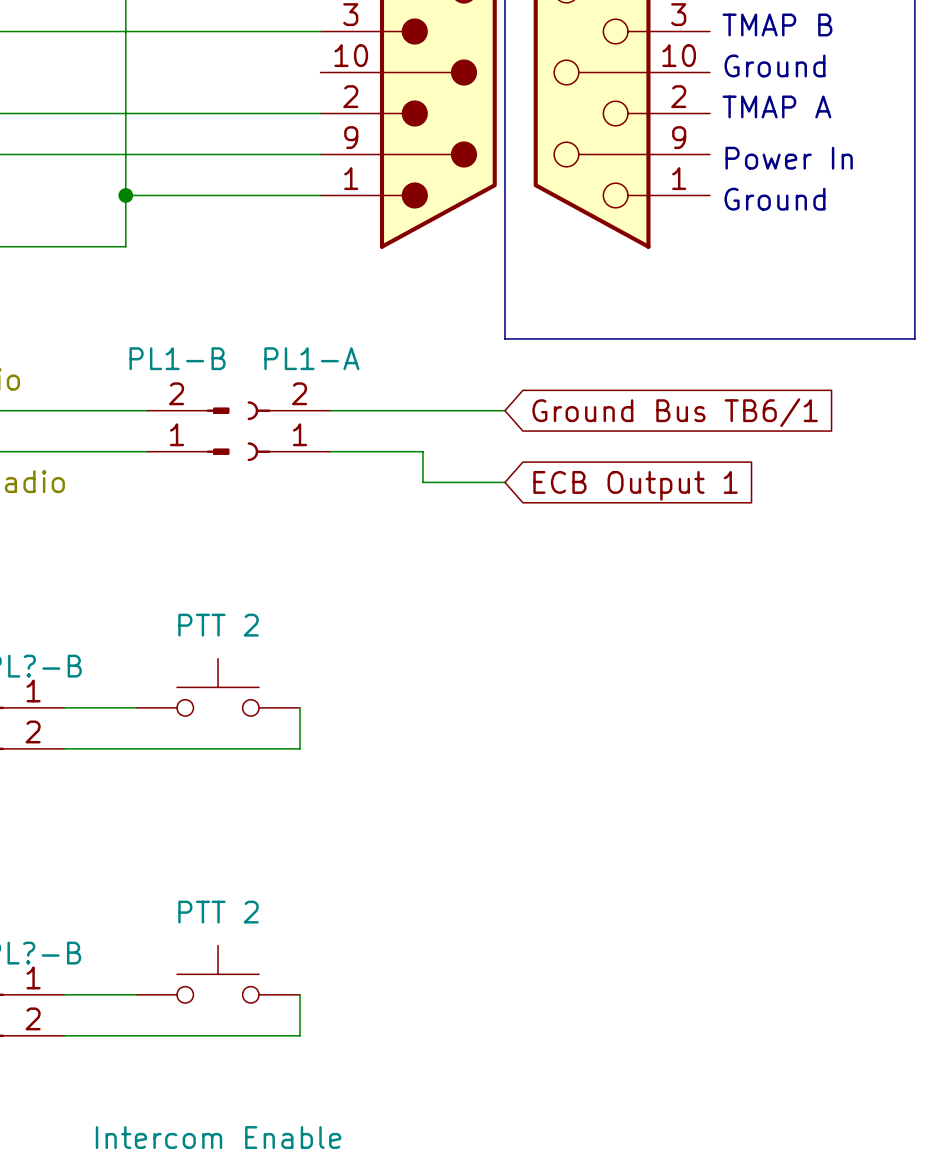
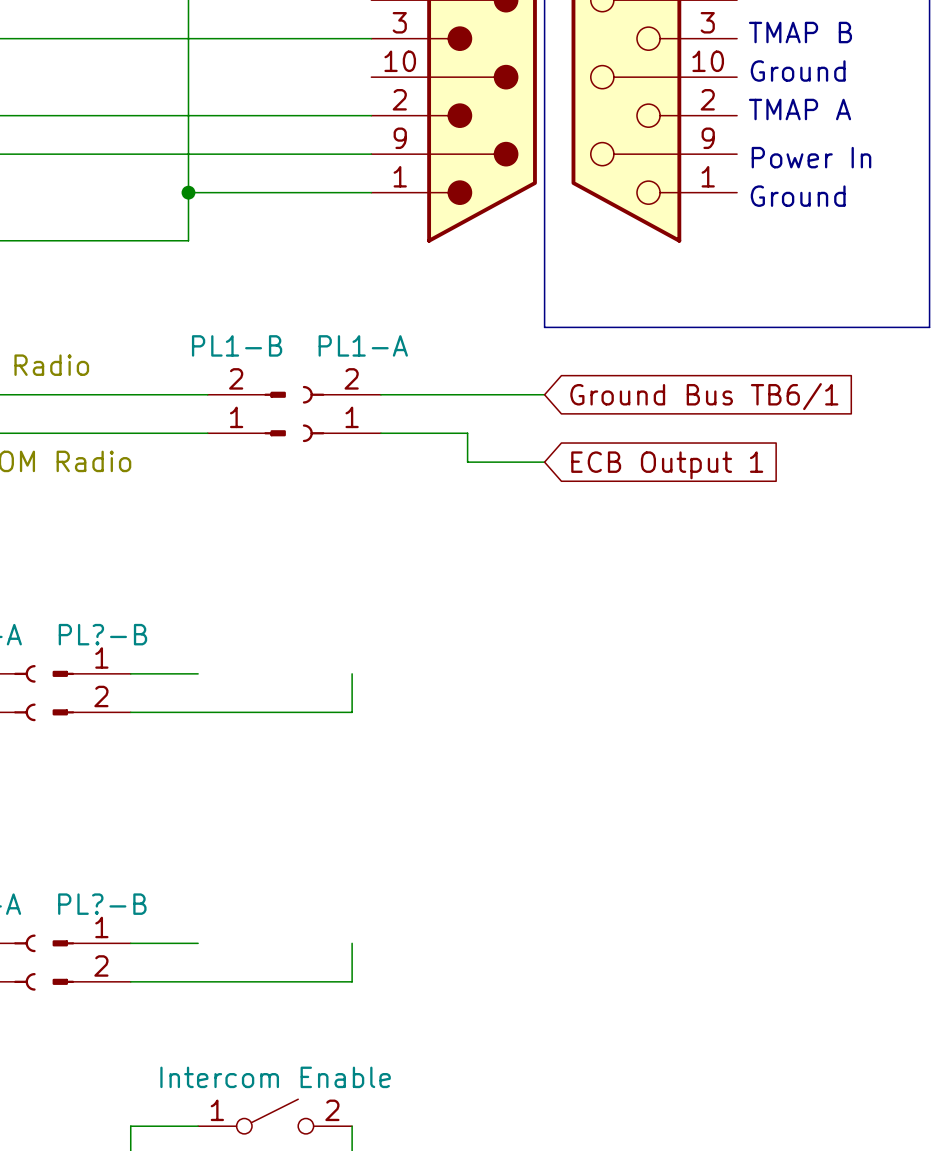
part: PTT 2 (218, 687) -> none
part: PTT 2 (218, 974) -> none

